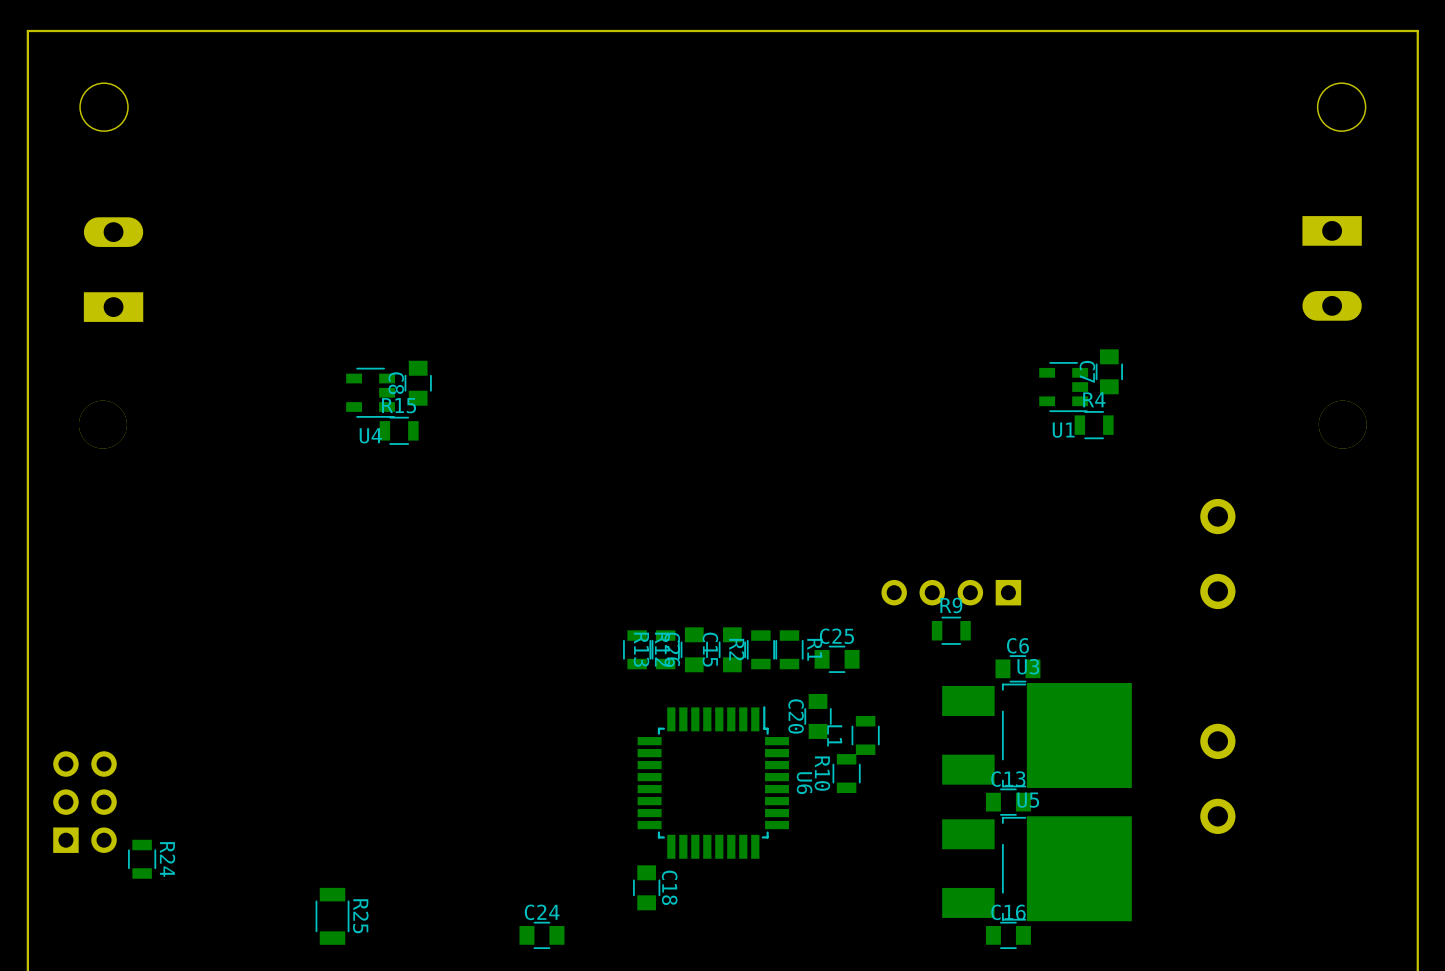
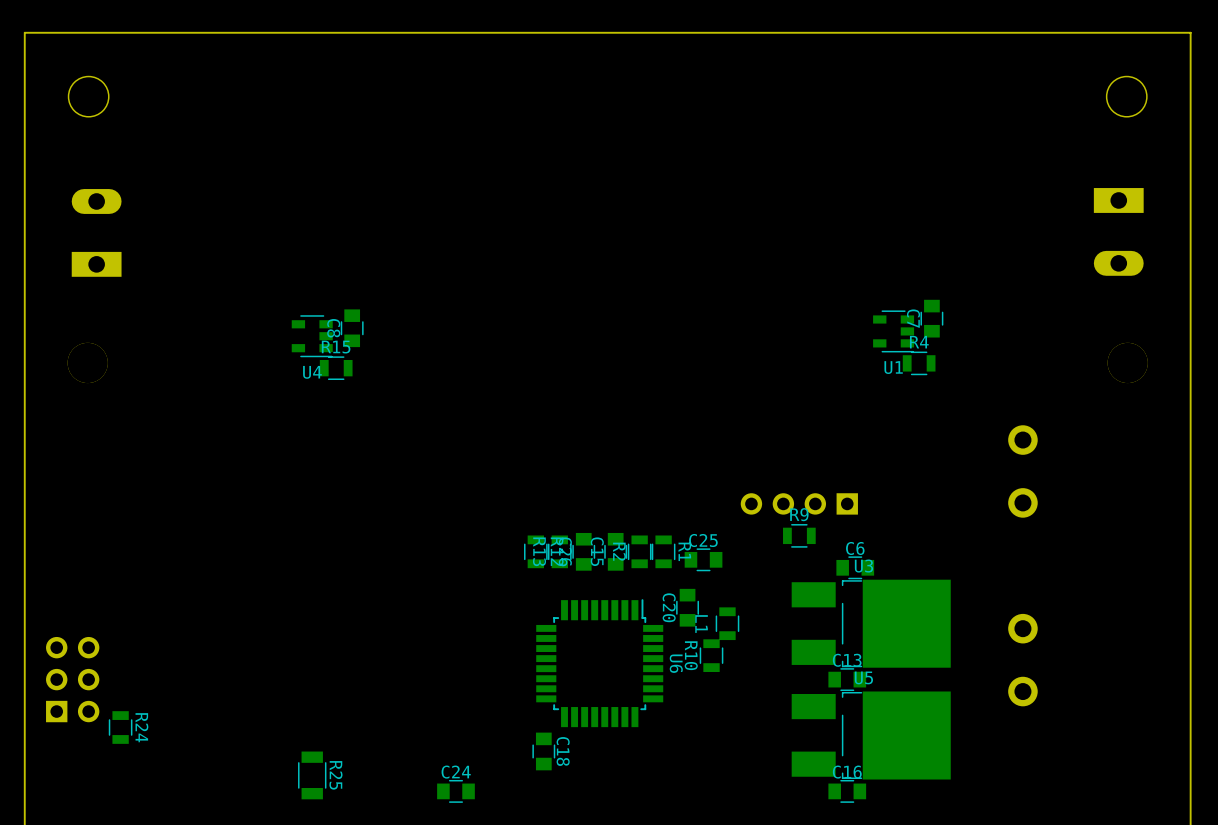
R25 position: (332, 916) -> (312, 775)

